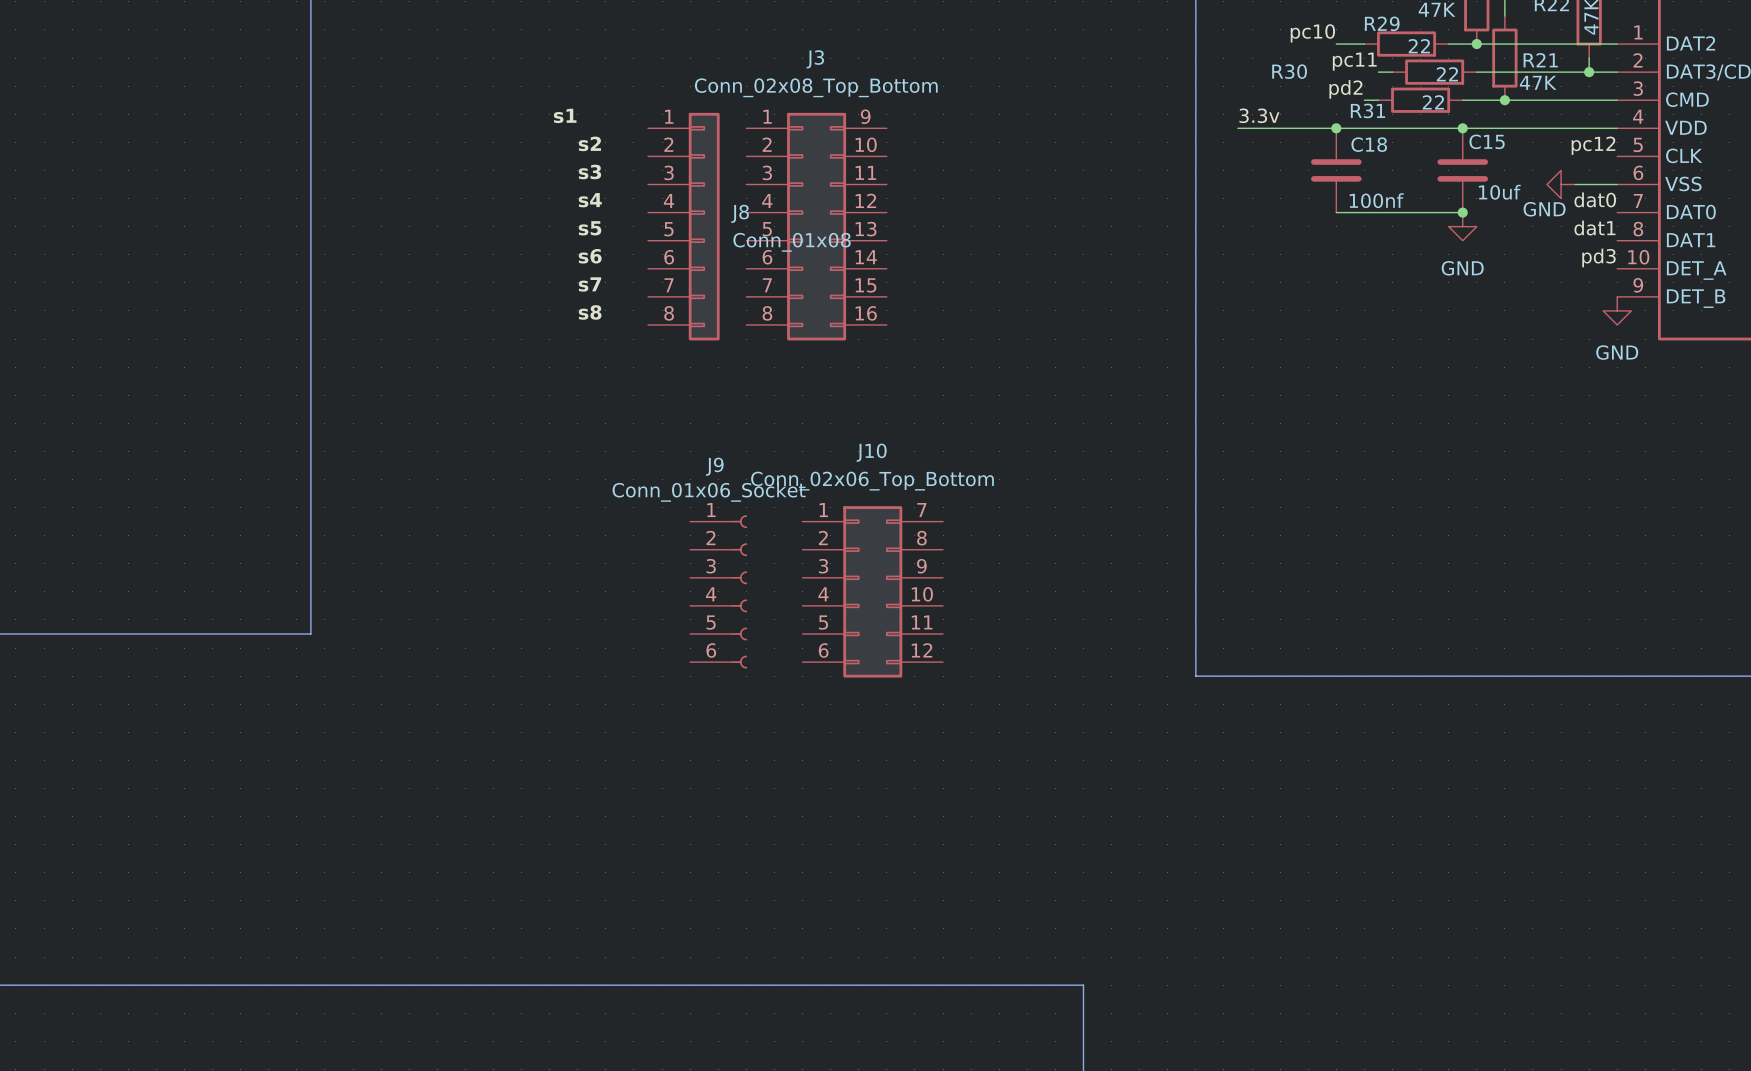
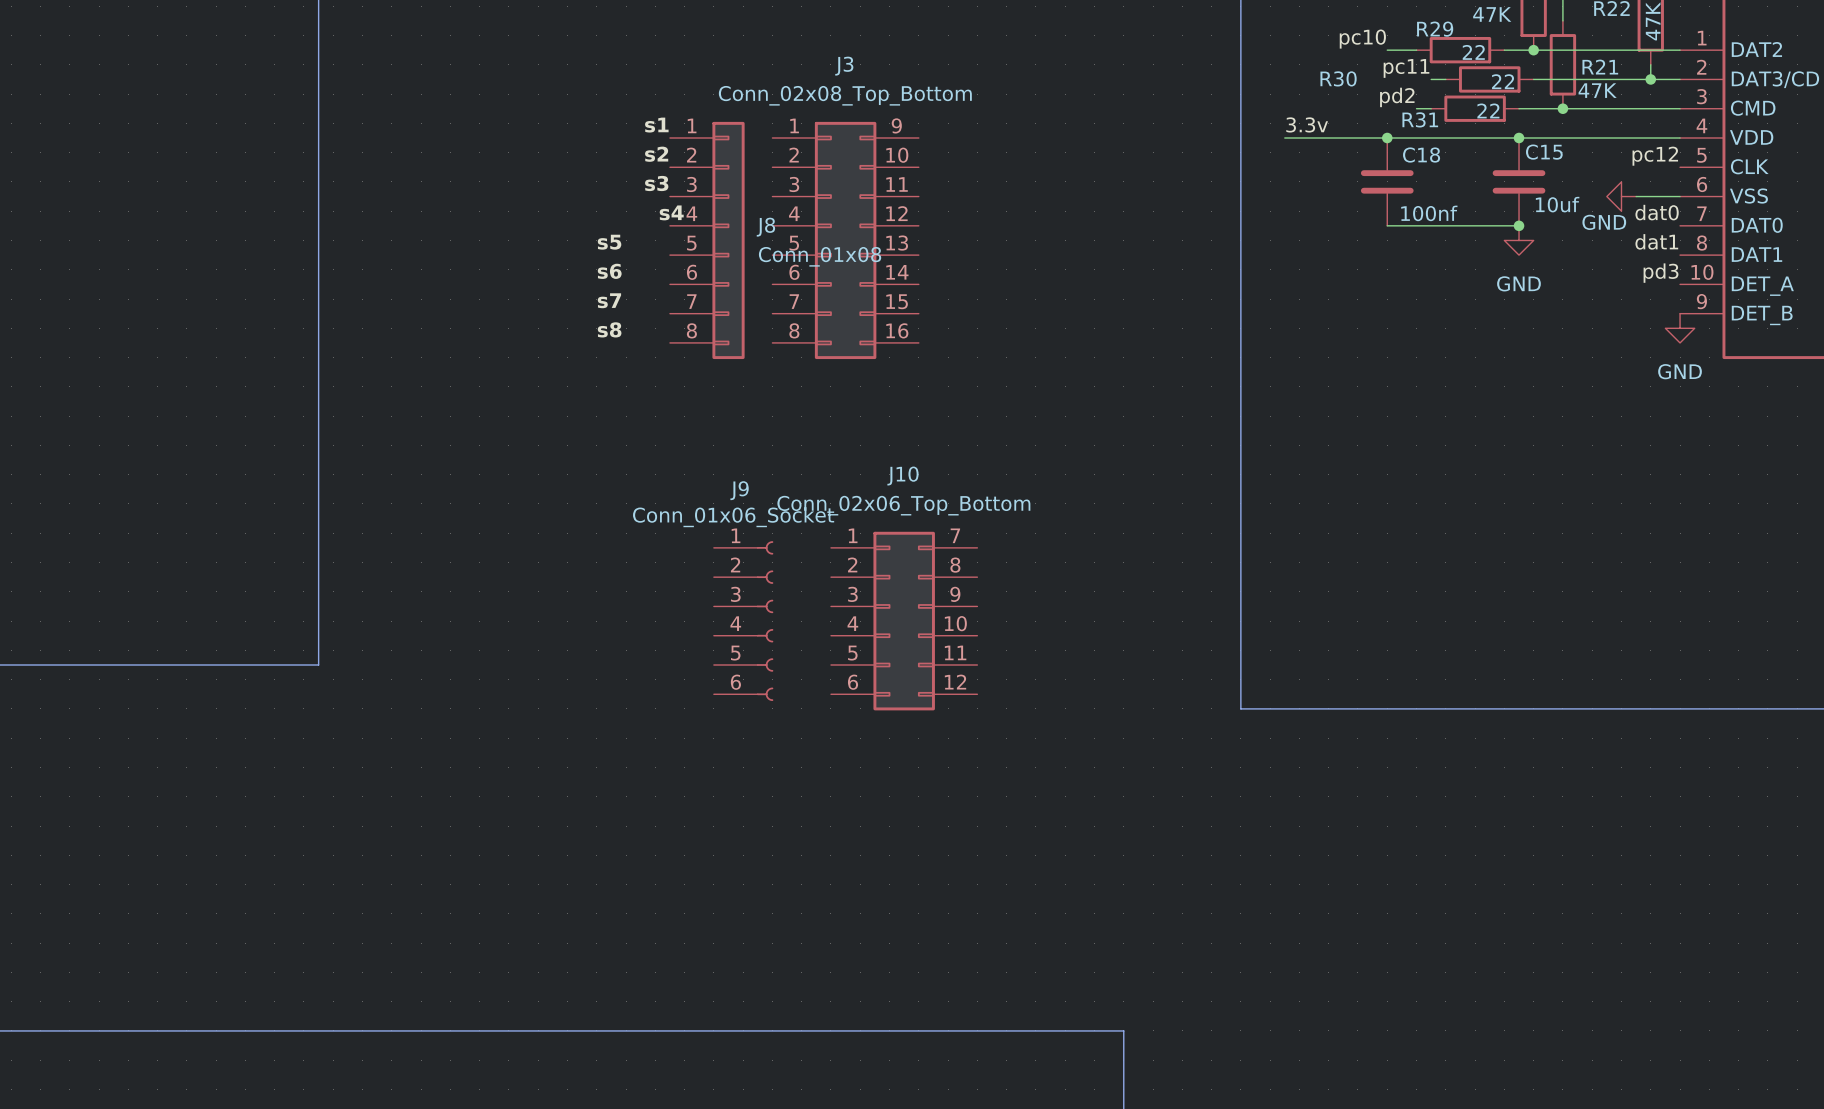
label position: s1 (565, 115) -> s1 (656, 125)
label position: s2 (589, 143) -> s2 (656, 154)
label position: s3 (589, 171) -> s3 (656, 183)
label position: s4 (590, 200) -> s4 (671, 212)

